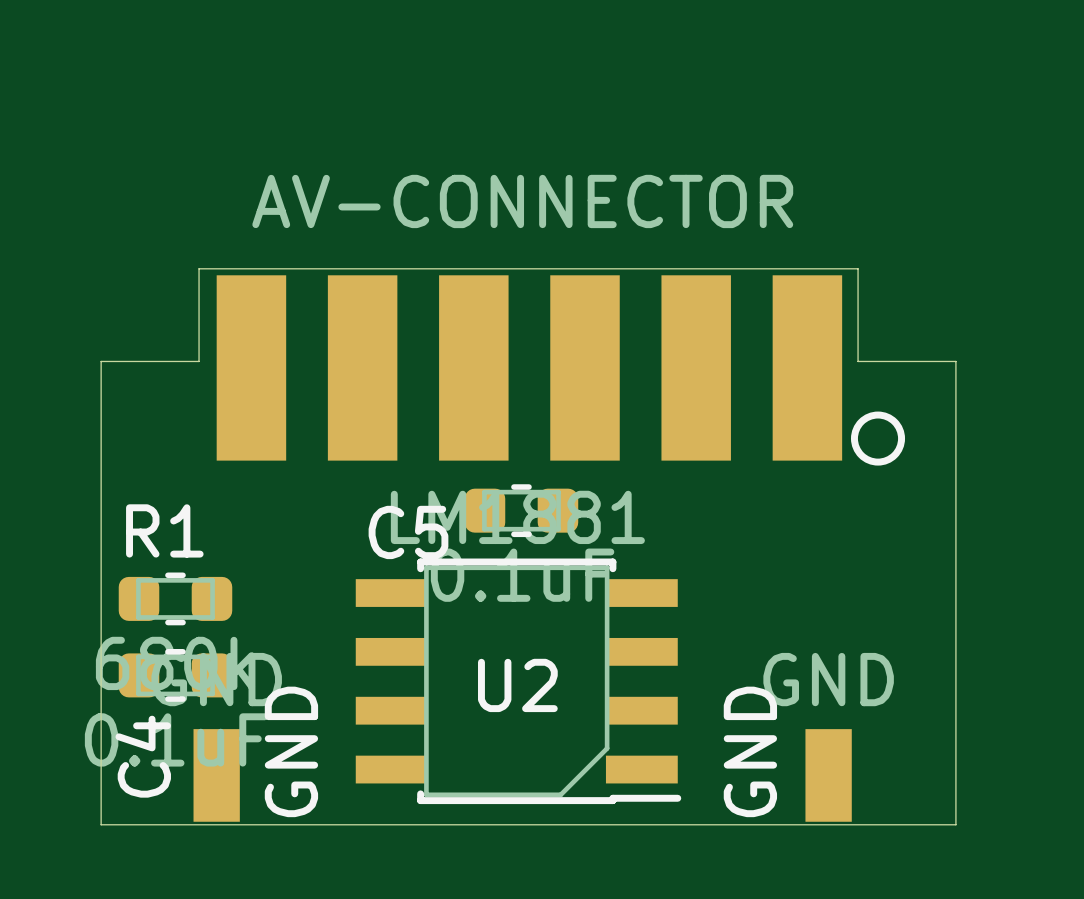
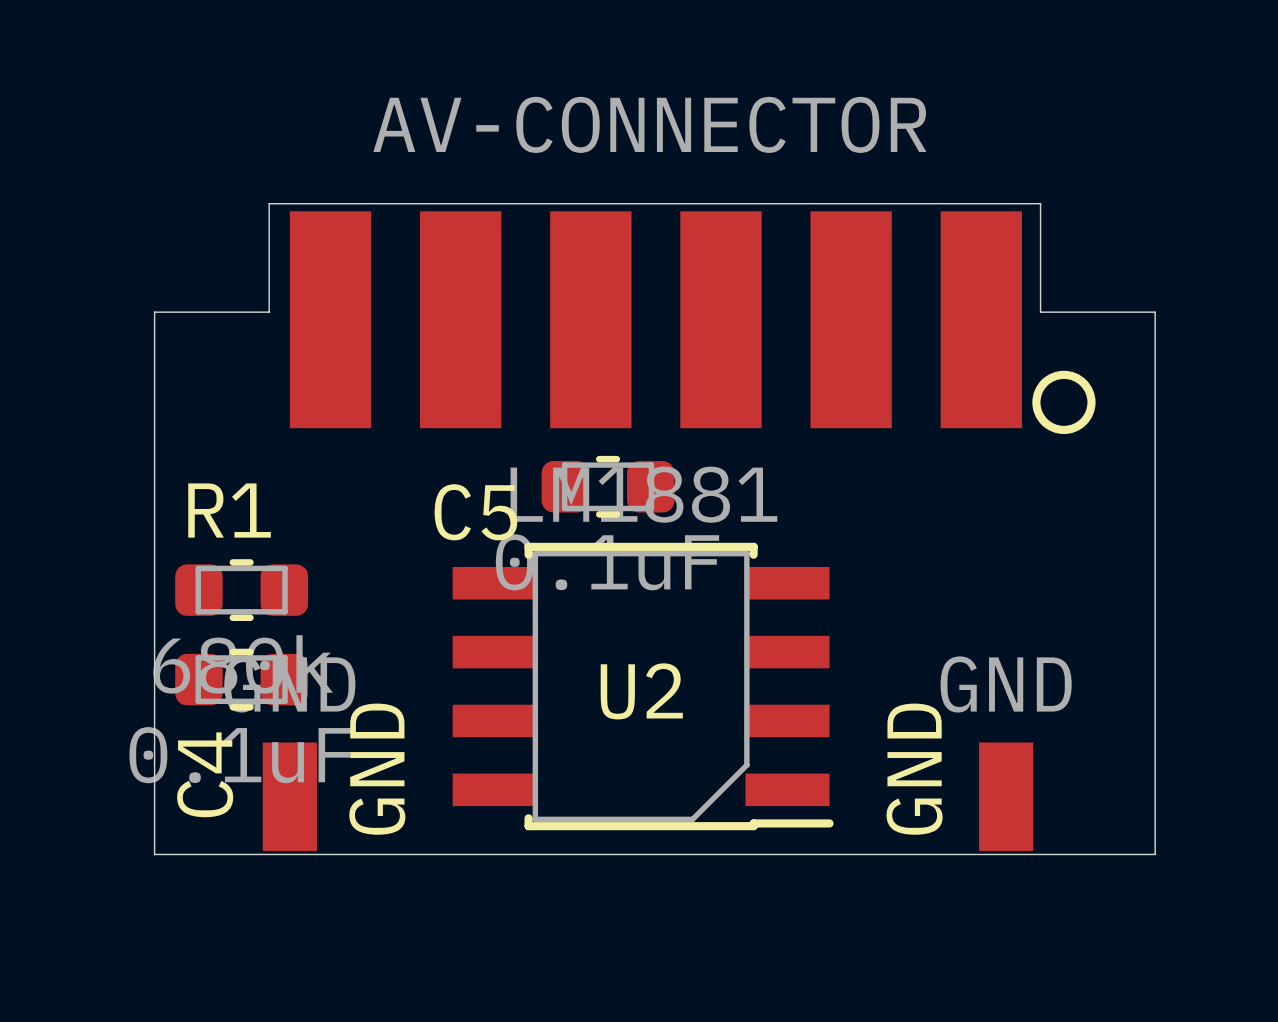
C5 position: (521, 510) -> (608, 486)

